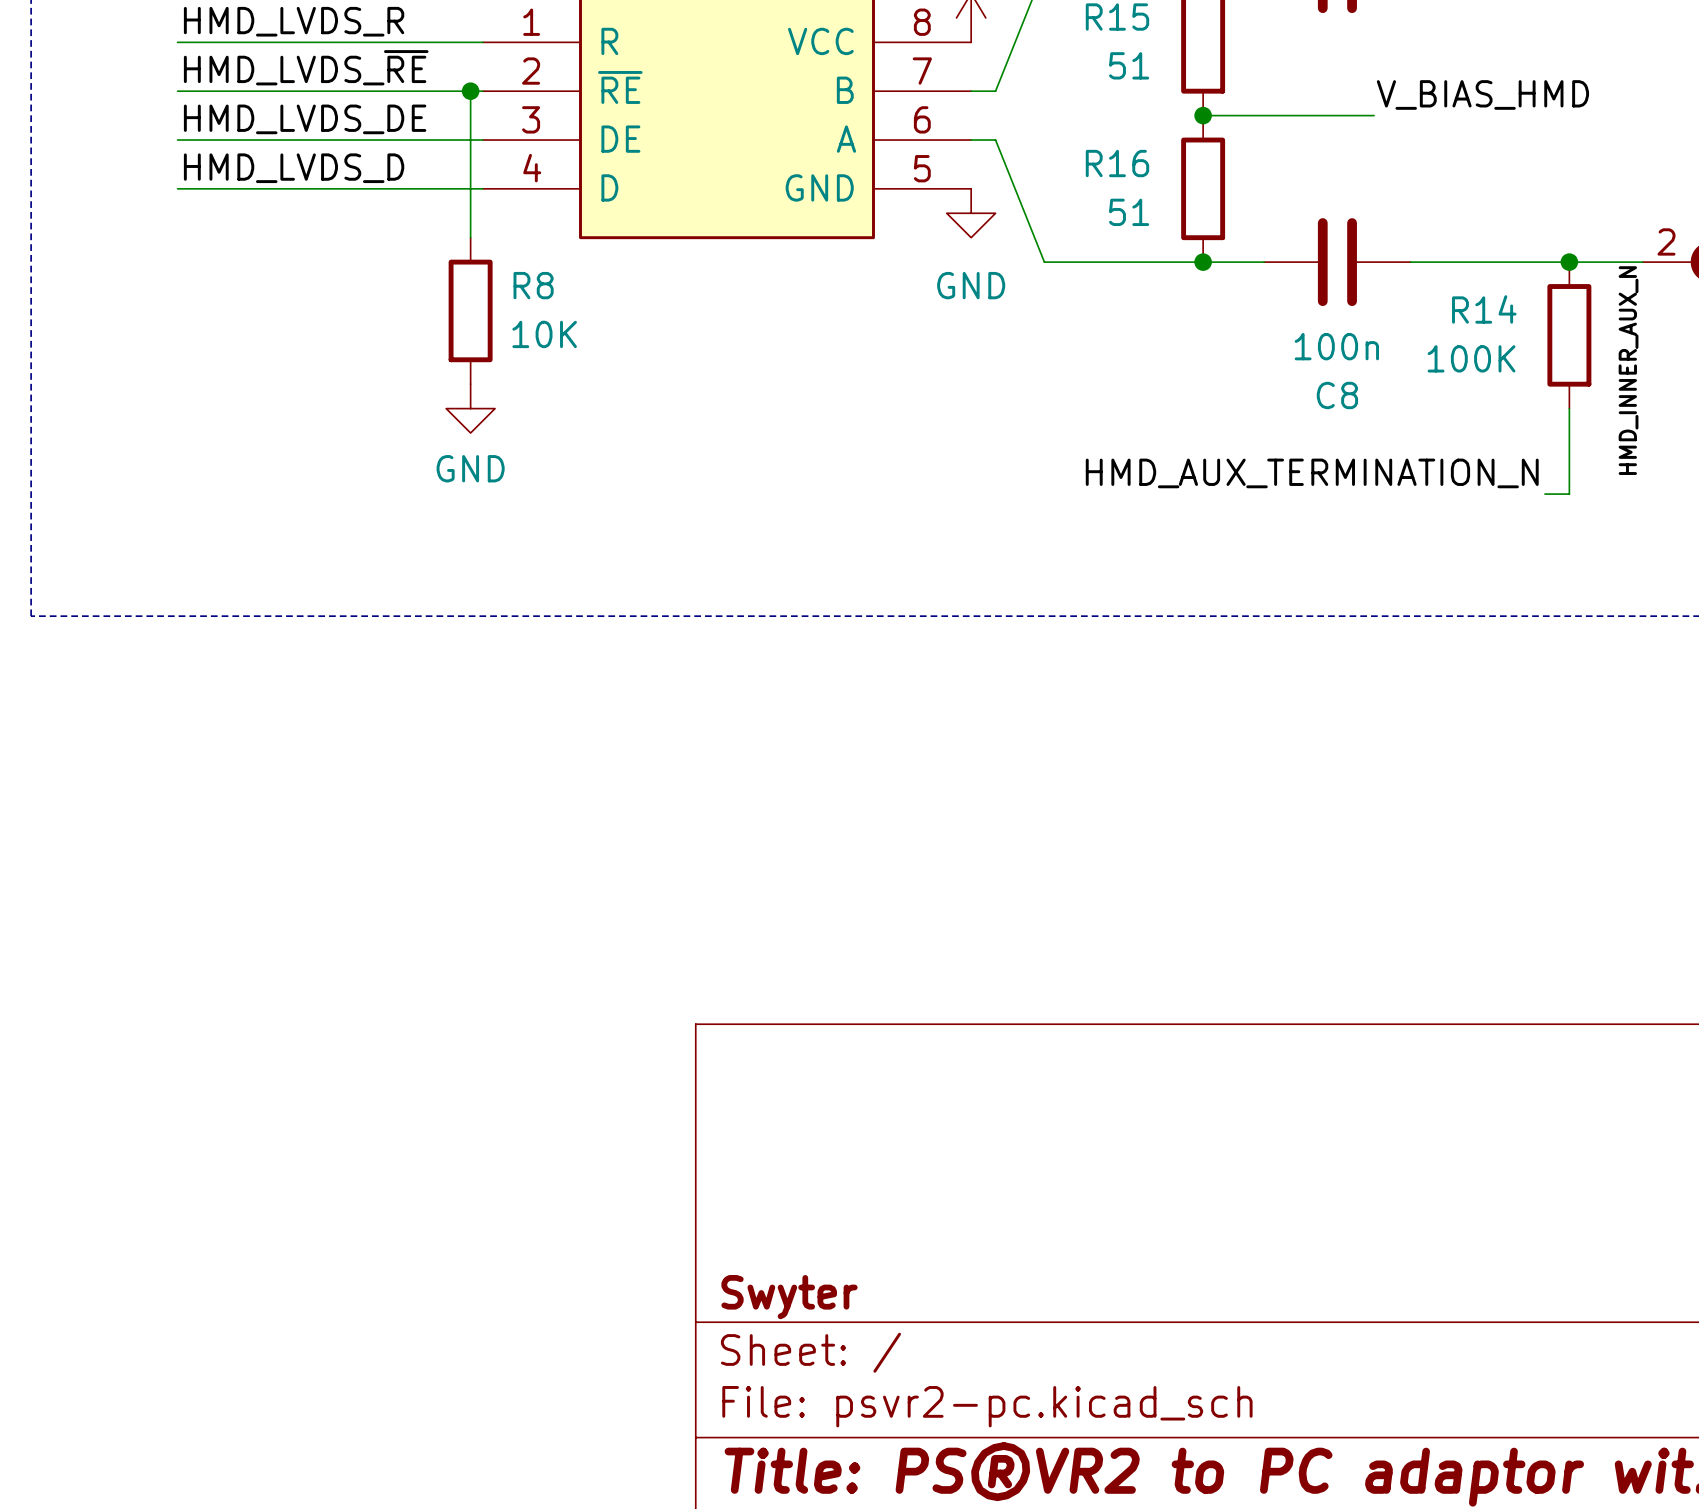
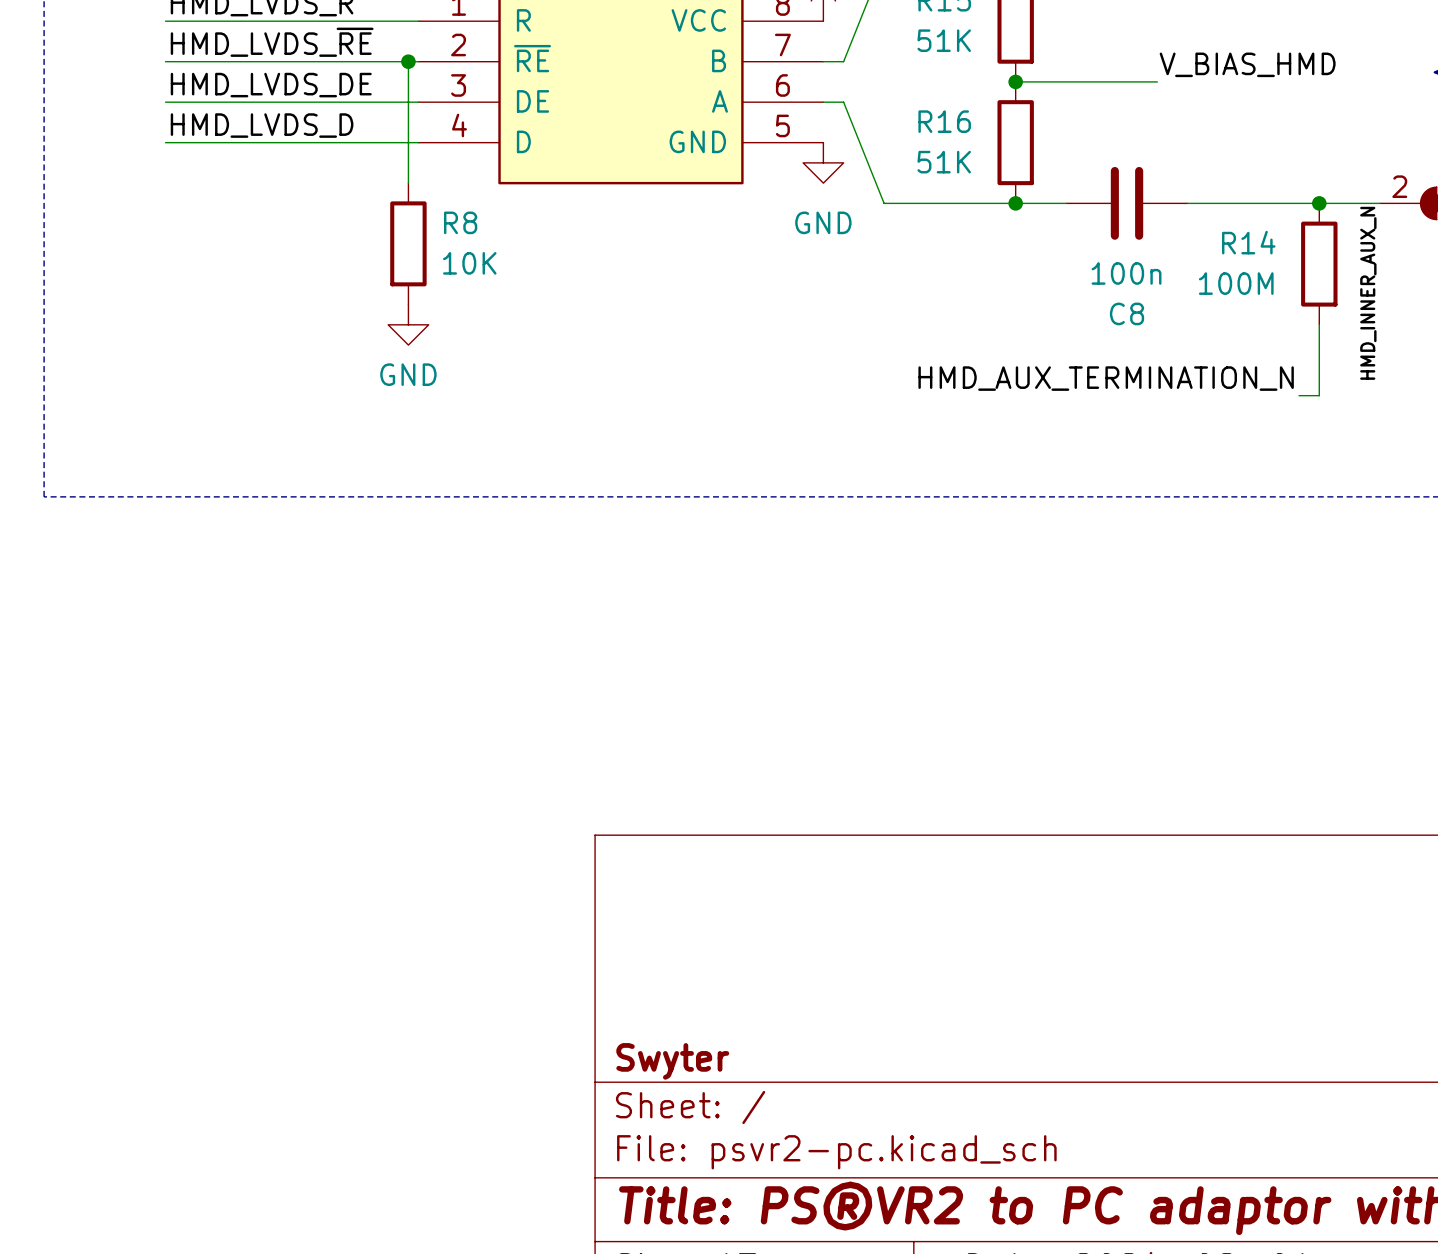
R15 value: 51 (1129, 65) -> 51K (944, 40)
R16 value: 51 (1129, 212) -> 51K (944, 162)
R14 value: 100K (1471, 358) -> 100M (1236, 283)

